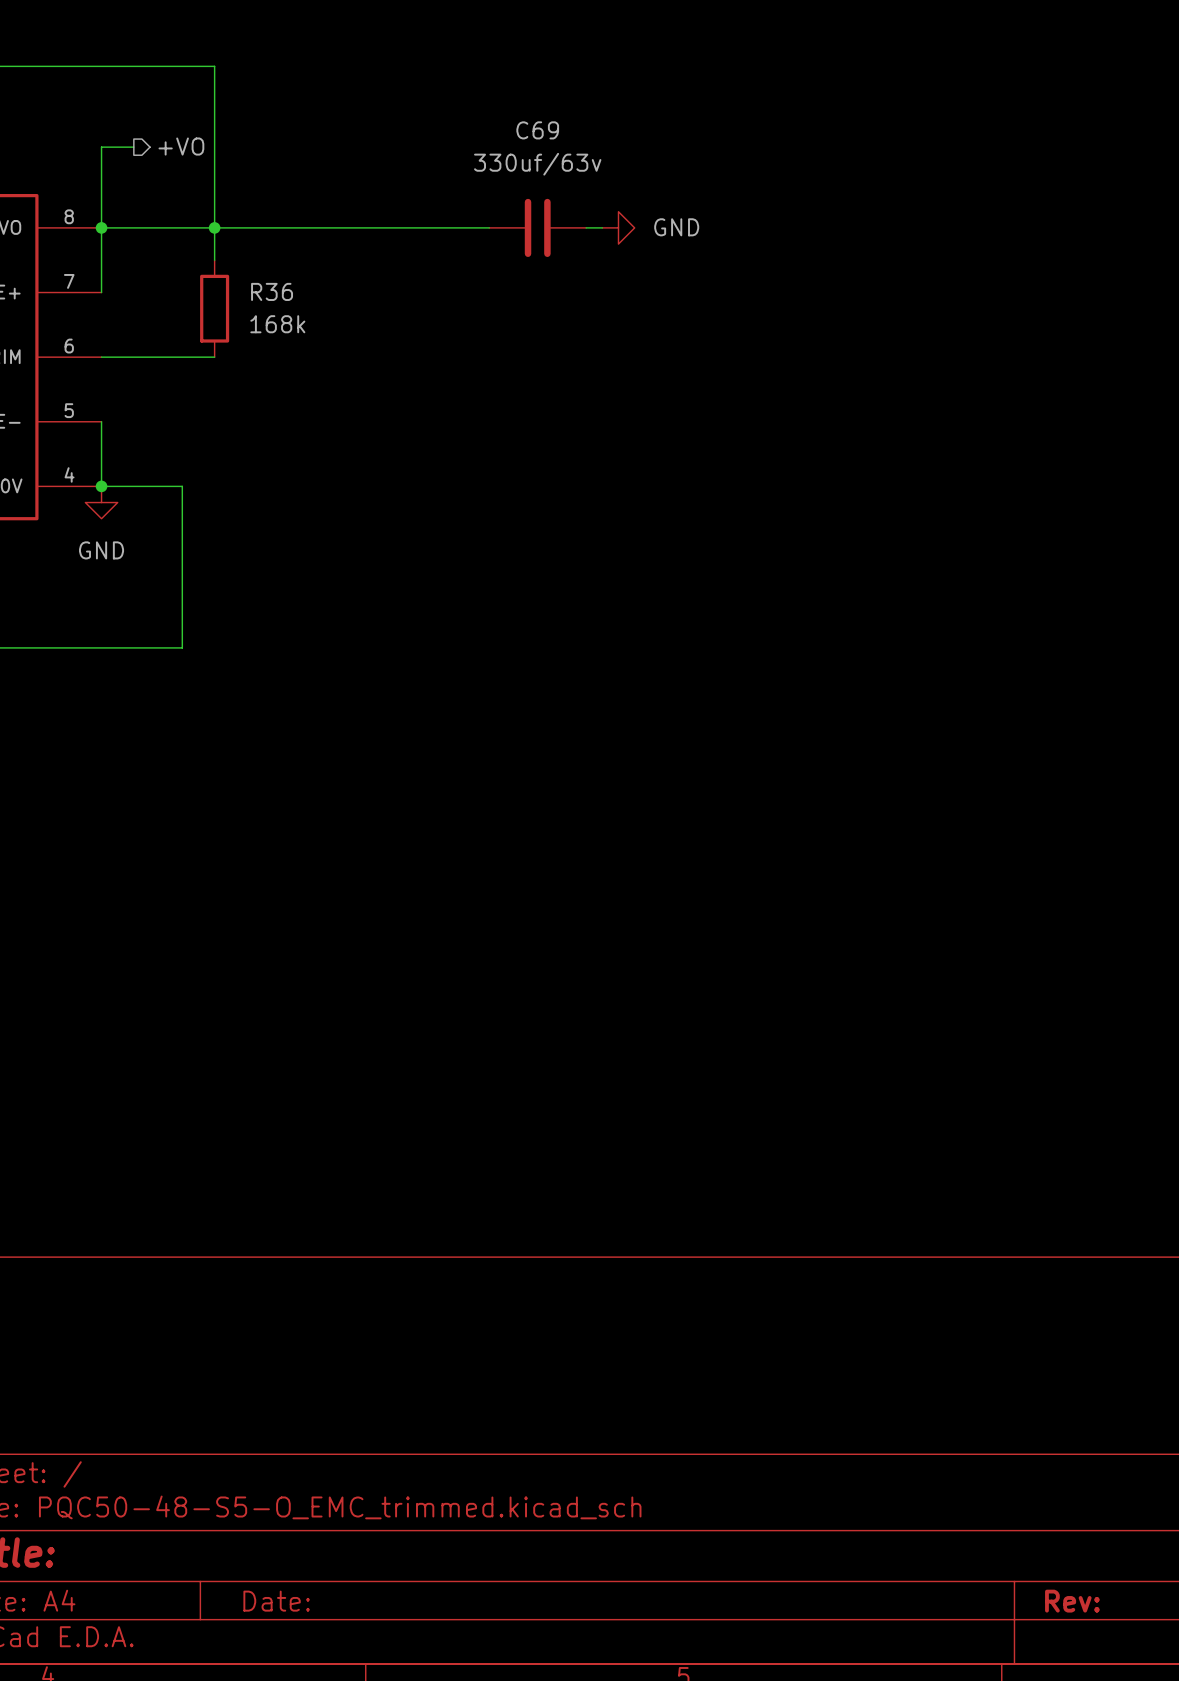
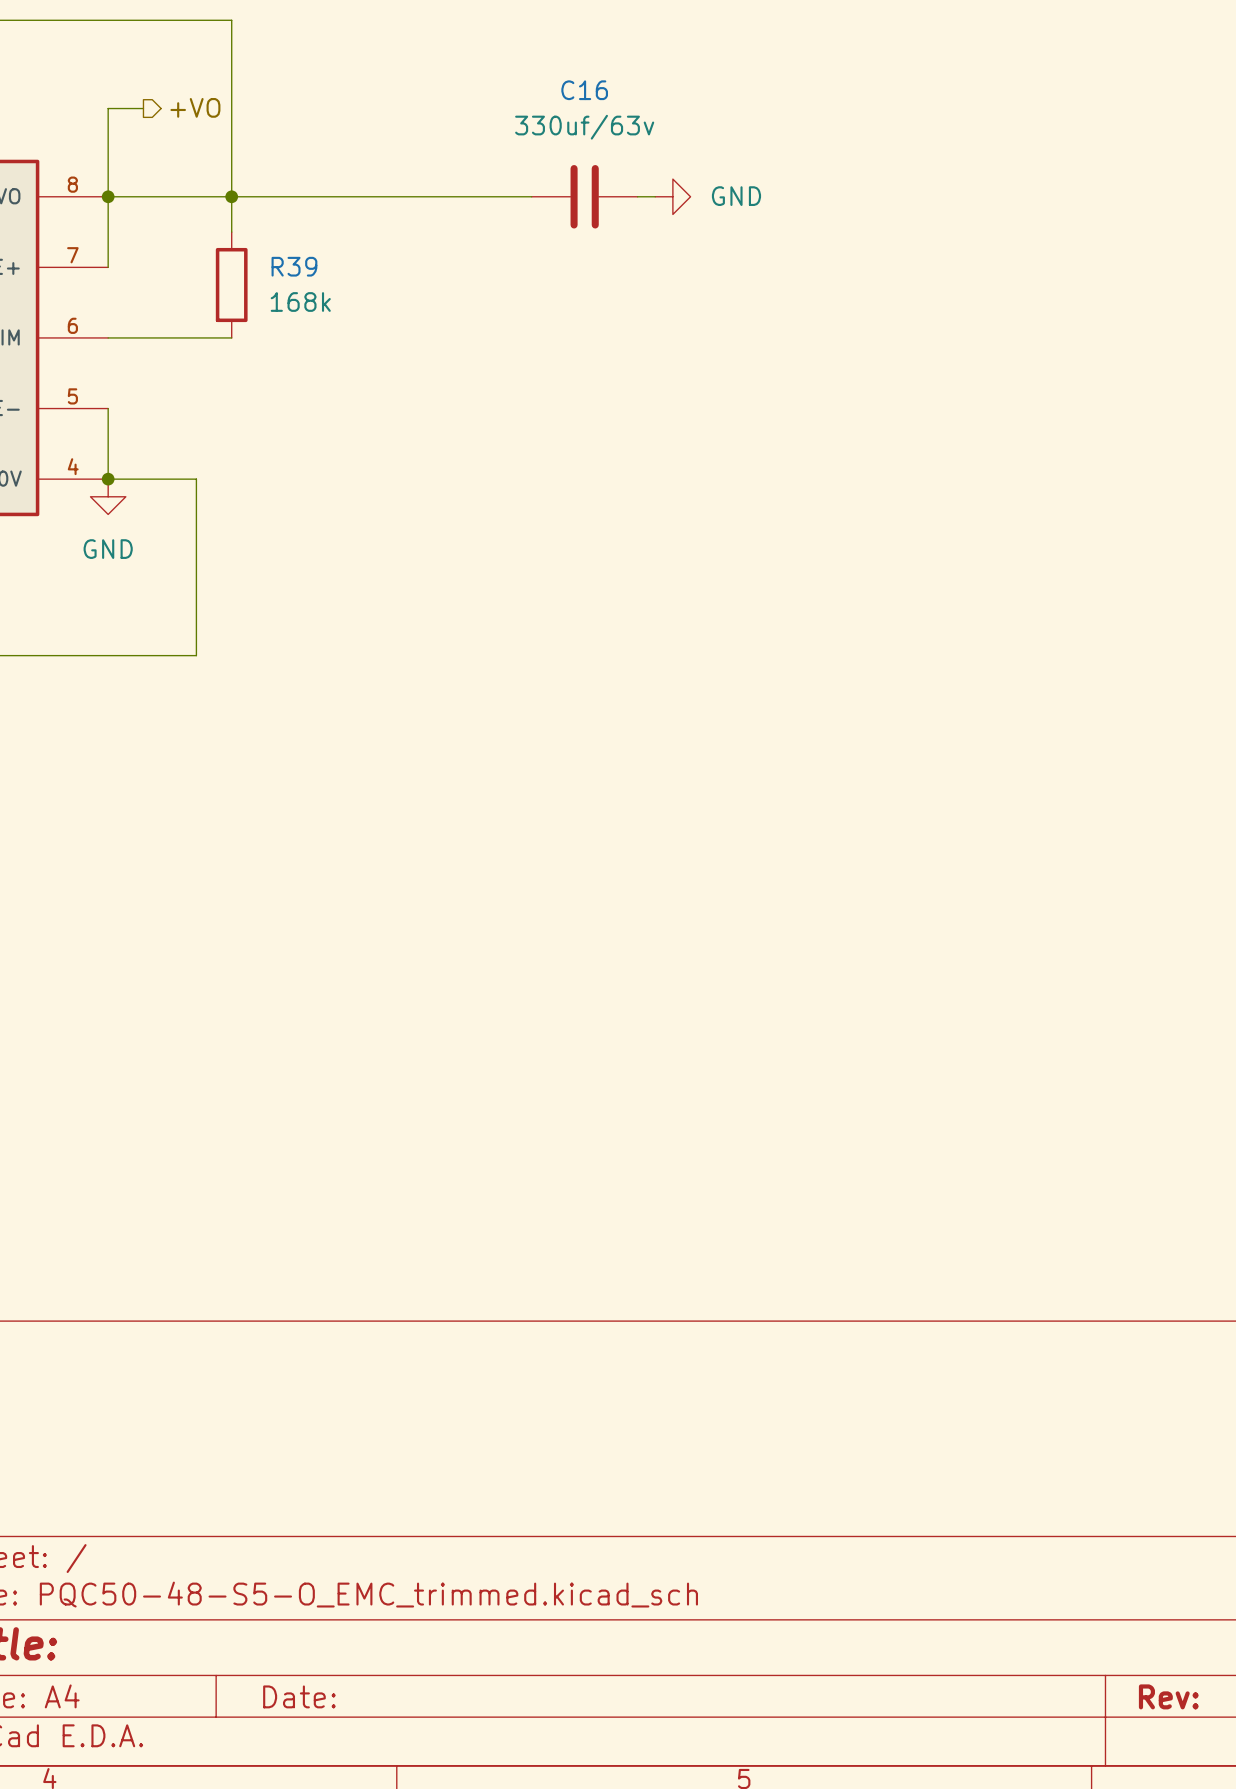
C69 name: C69 (537, 130) -> C16 (584, 90)
R36 name: R36 (272, 291) -> R39 (294, 266)

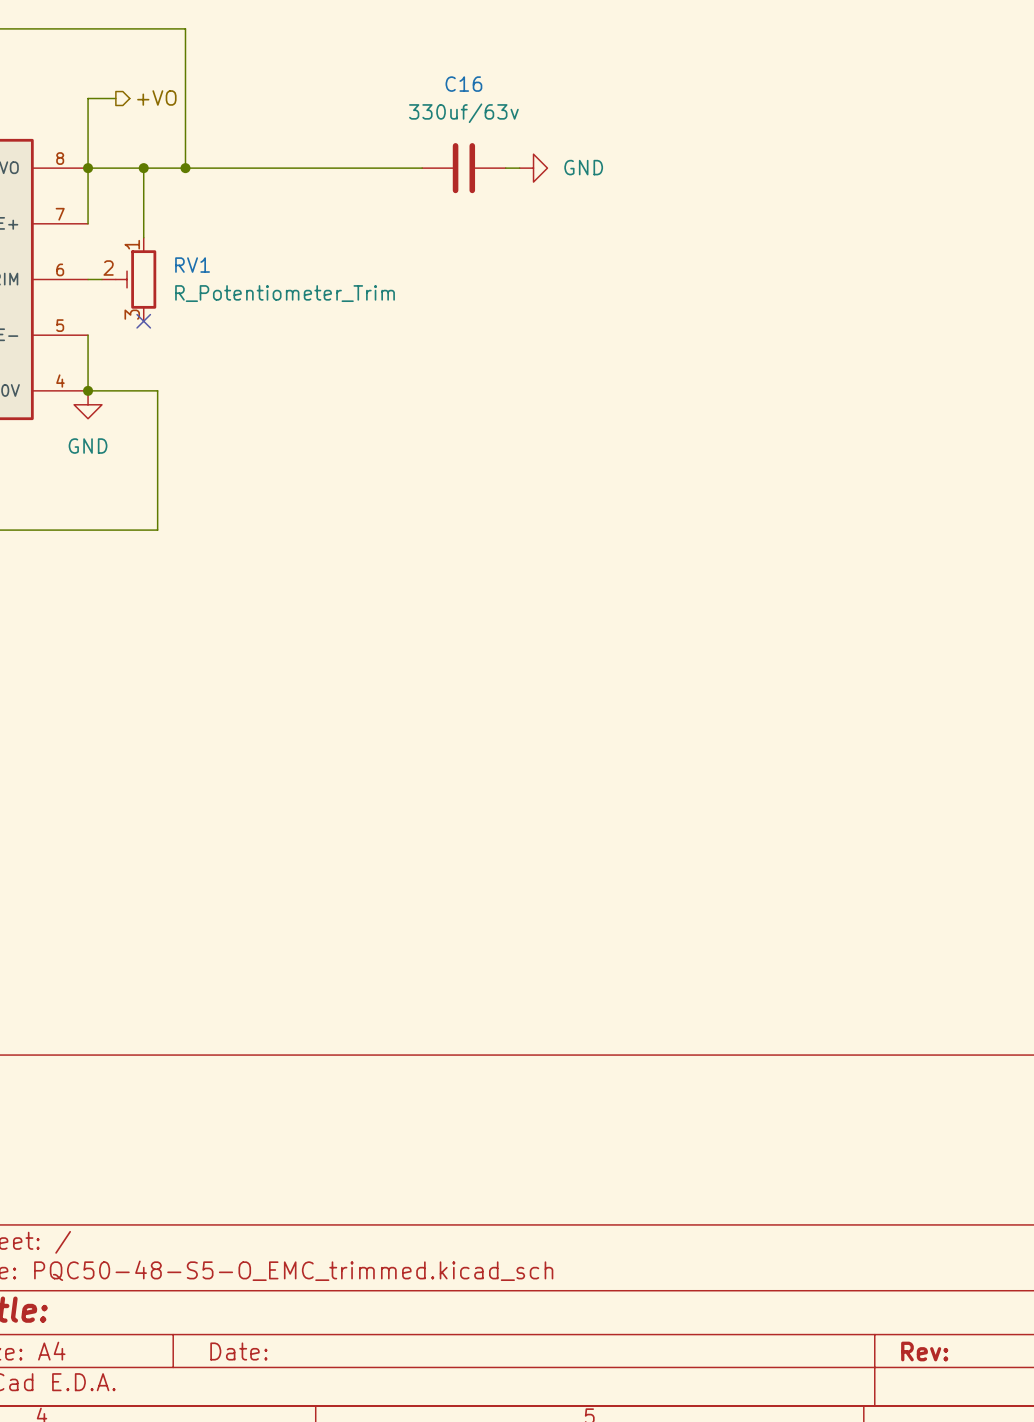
wire: none -> (143, 168) (143, 237)
junction: none -> (143, 168)
wire: (231, 196) (231, 232) -> none
R39: 168k (231, 285) -> none
wire: (125, 337) (231, 337) -> none
RV1: none -> R_Potentiometer_Trim (129, 279)
no-connect mark: none -> (143, 321)

